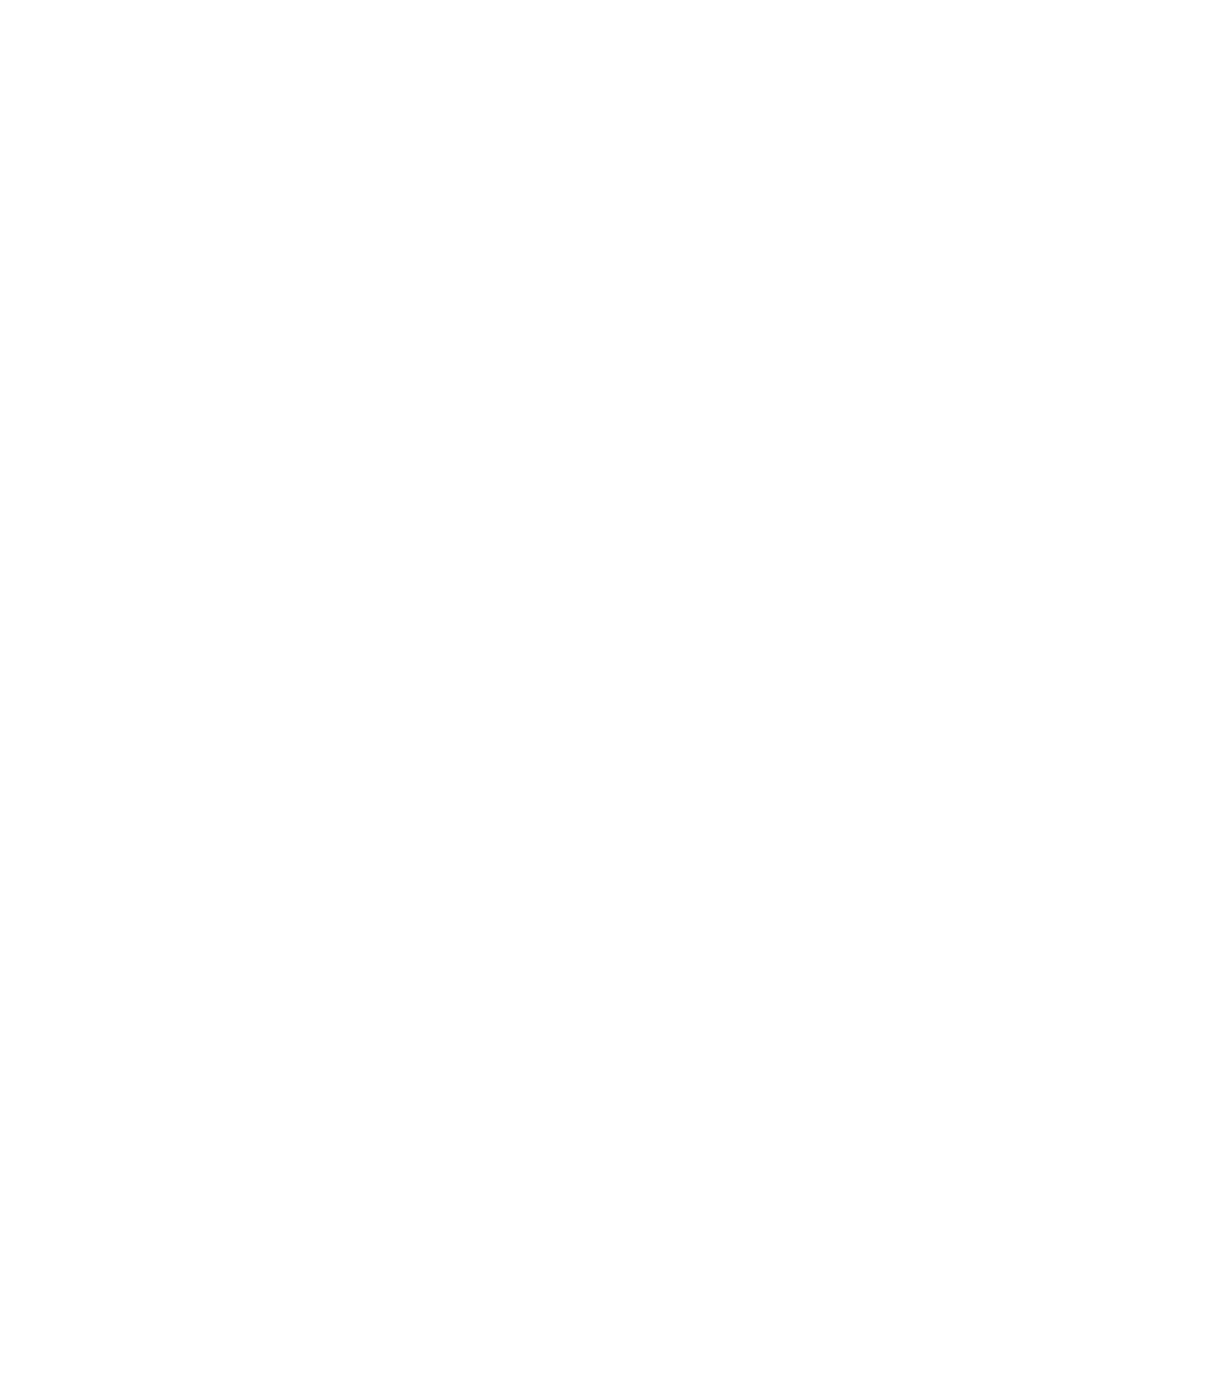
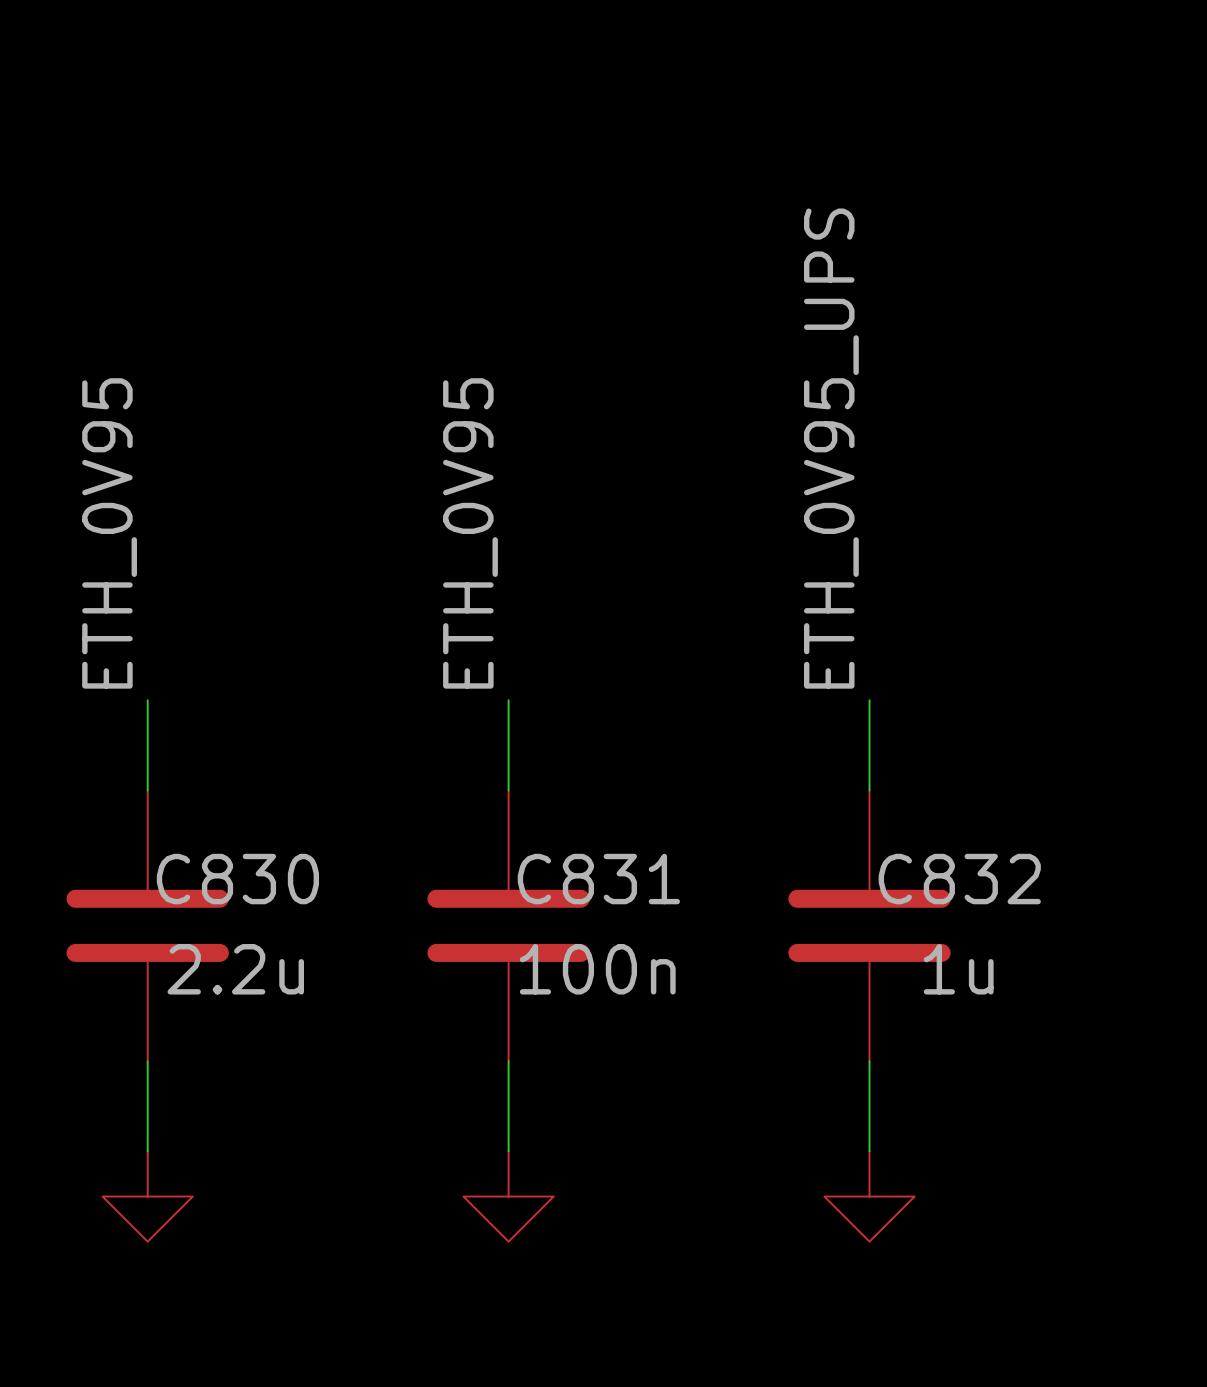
label: none -> ETH_0V95_UPS (831, 448)
label: none -> ETH_0V95 (109, 533)
label: none -> ETH_0V95 (470, 533)
wire: none -> (147, 700) (147, 790)
wire: none -> (508, 700) (508, 790)
wire: none -> (869, 700) (869, 790)
C830: none -> 2.2u (147, 925)
C831: none -> 100n (508, 925)
C832: none -> 1u (869, 925)
wire: none -> (147, 1061) (147, 1151)
wire: none -> (508, 1061) (508, 1151)
wire: none -> (869, 1061) (869, 1151)
power symbol: none -> (147, 1196)
power symbol: none -> (508, 1196)
power symbol: none -> (869, 1196)

